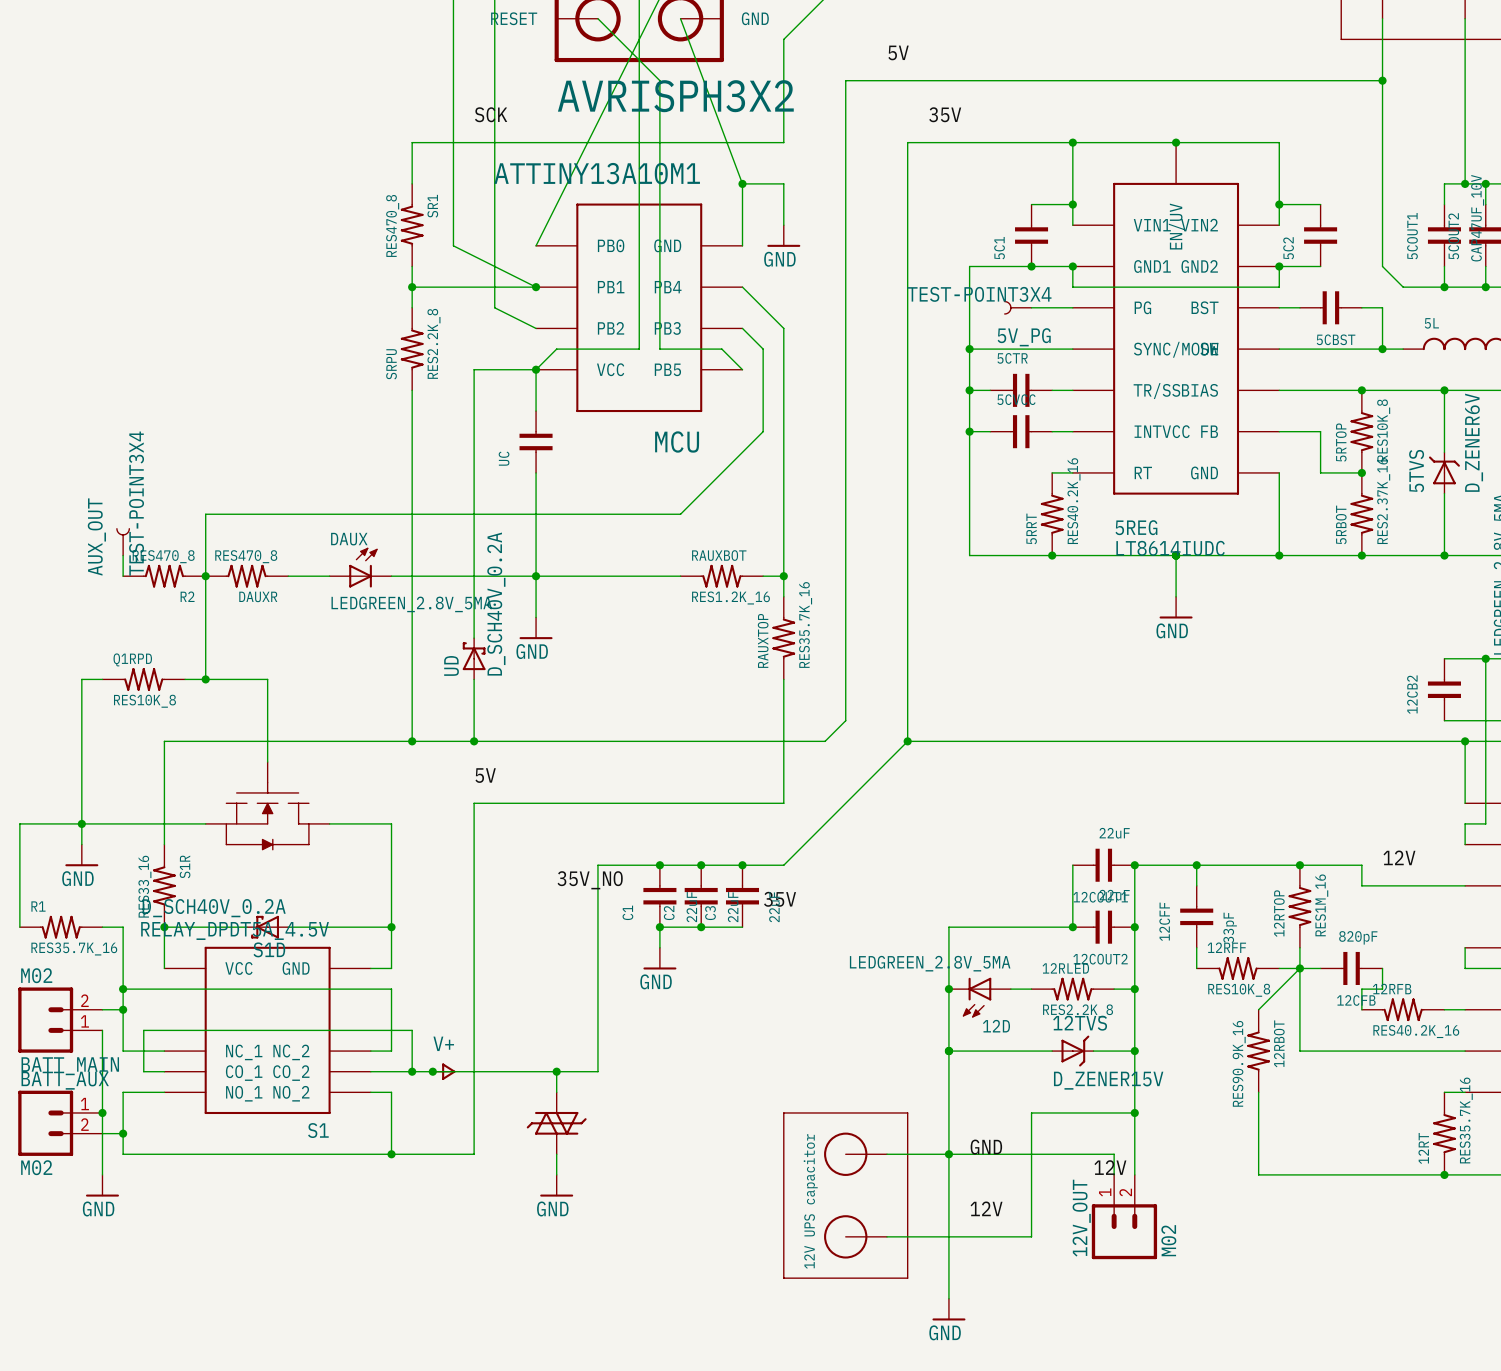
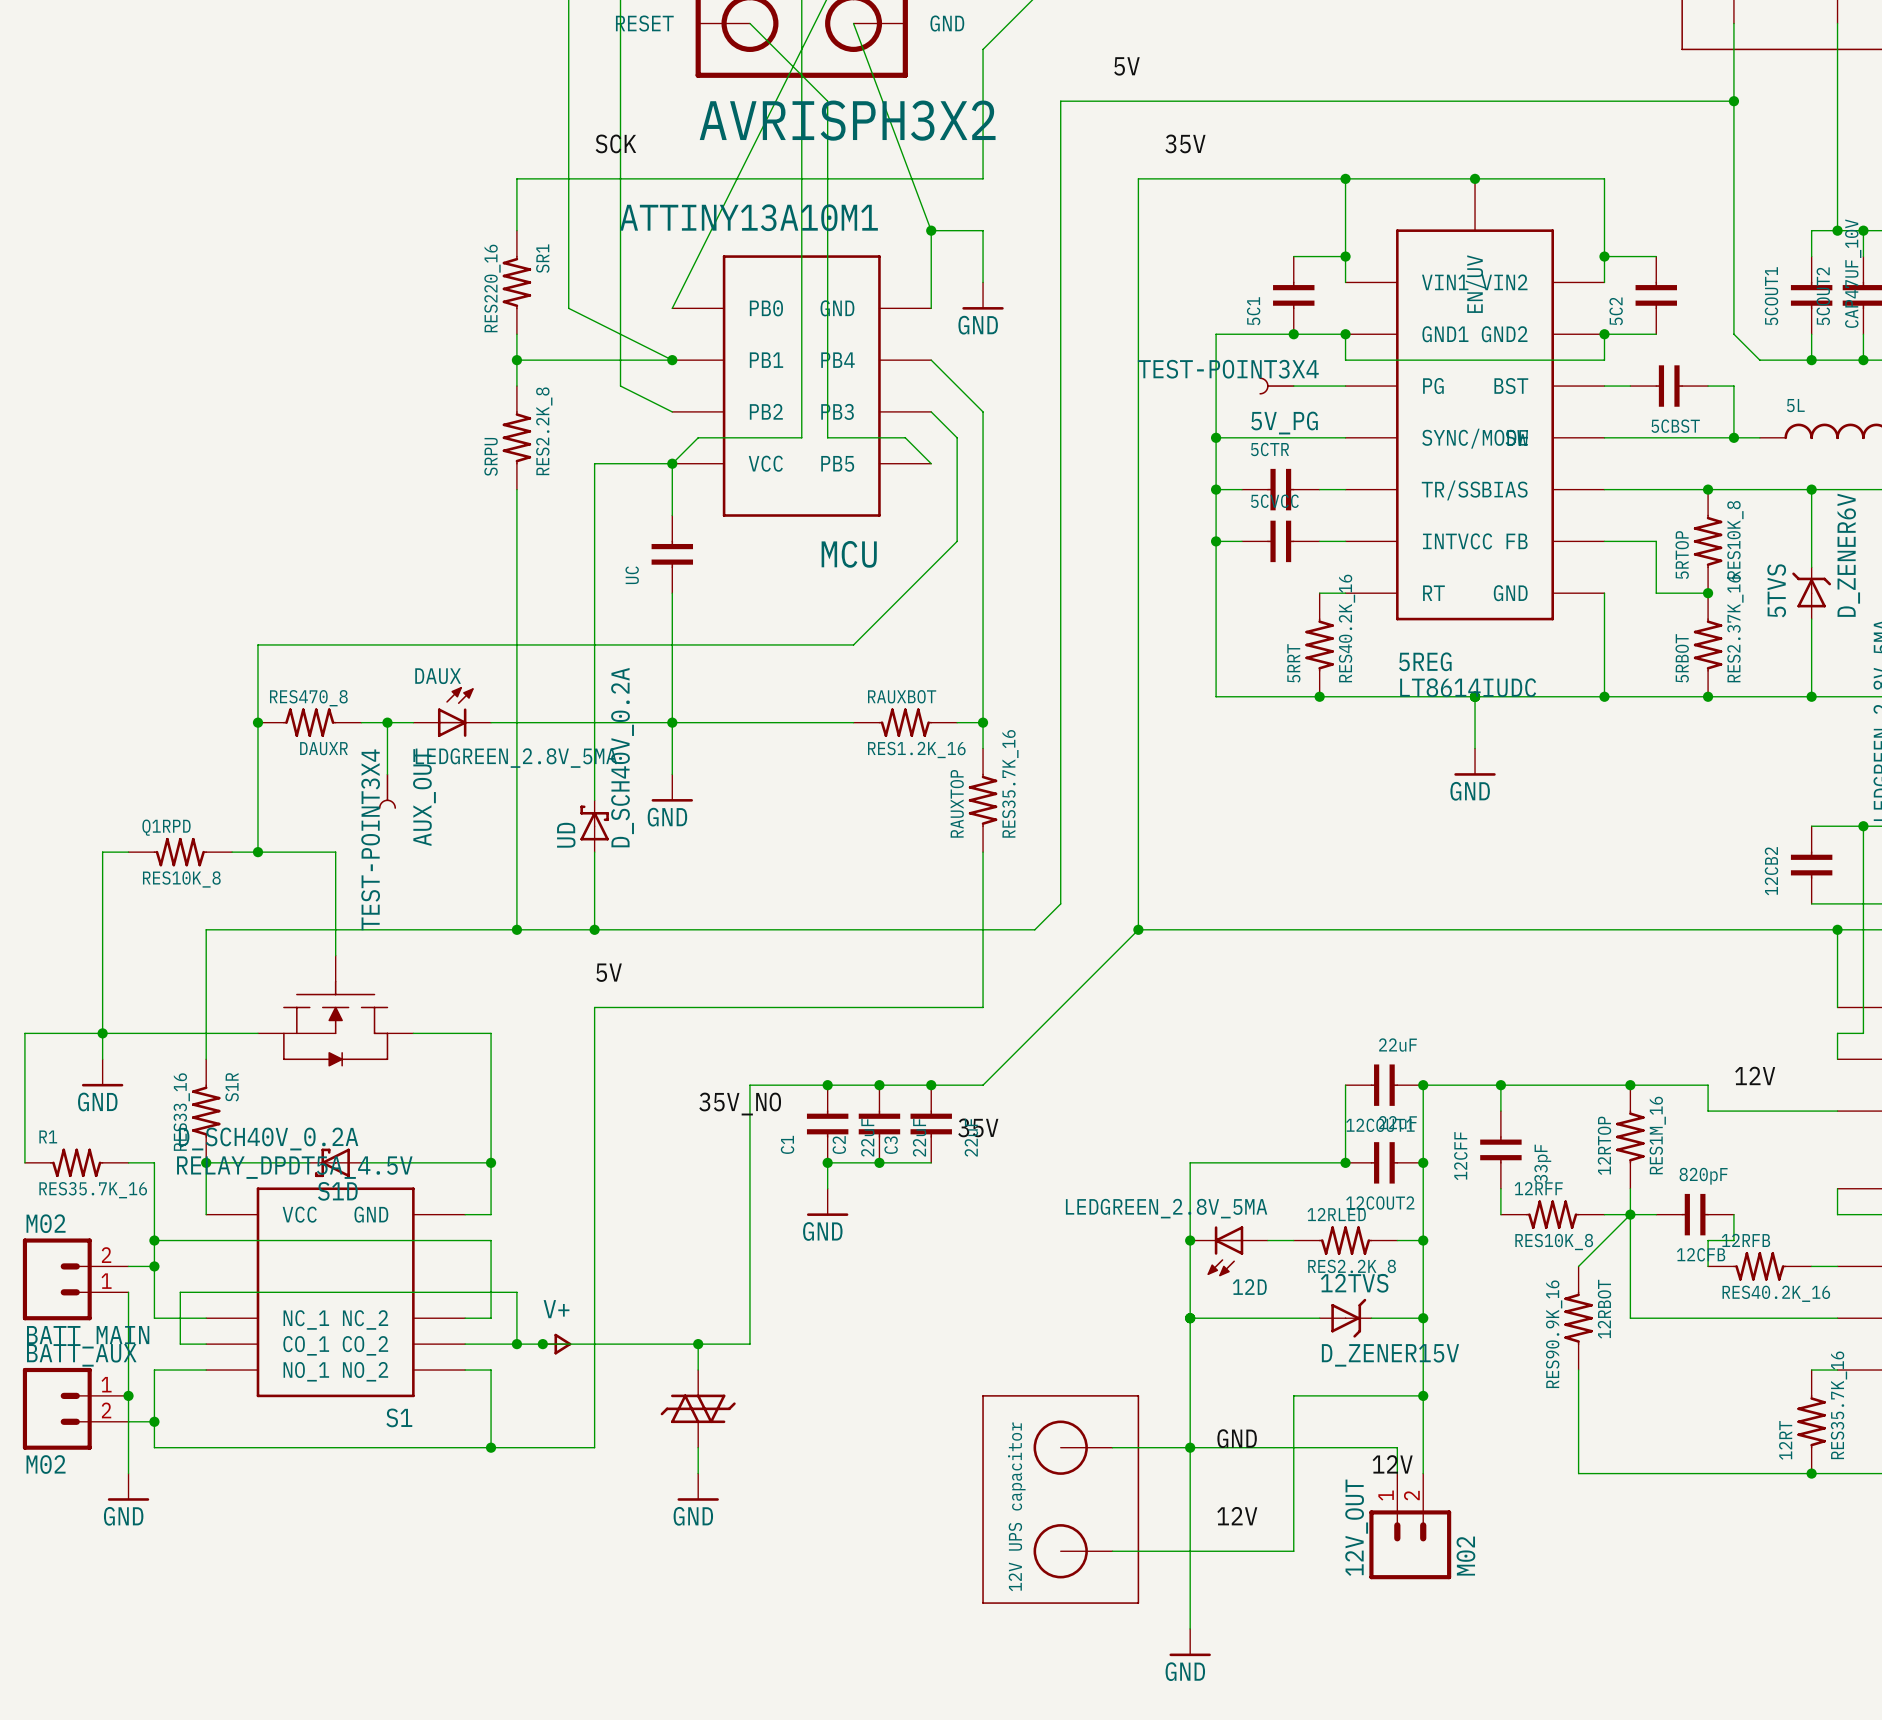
SR1 value: RES470_8 (392, 225) -> RES220_16 (492, 288)
AUX_OUT: TEST-POINT3X4 (123, 542) -> none
wire: (123, 555) (123, 576) -> none
R2: RES470_8 (164, 576) -> none
wire: none -> (387, 722) (387, 774)
junction: none -> (387, 722)
AUX_OUT: none -> TEST-POINT3X4 (387, 791)

